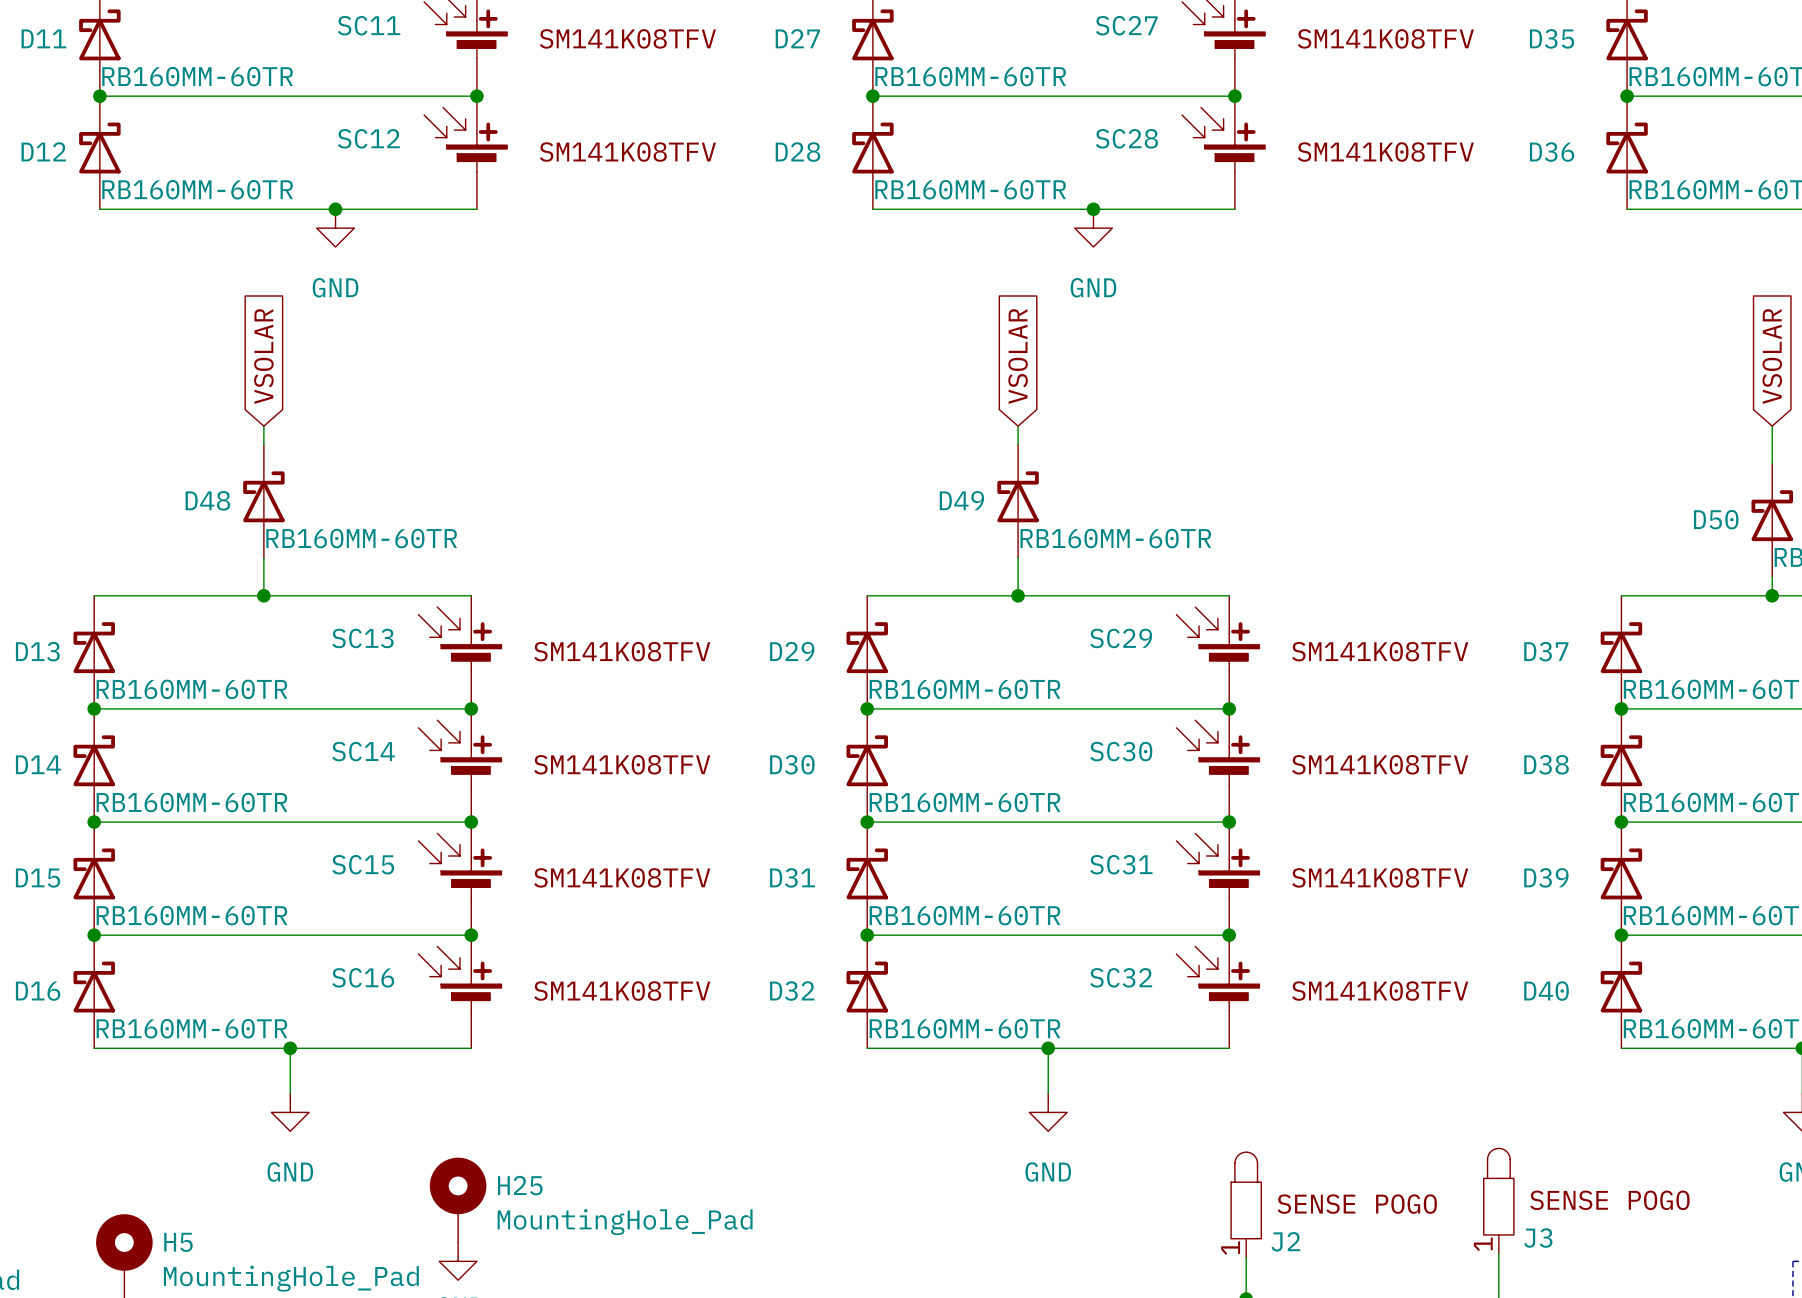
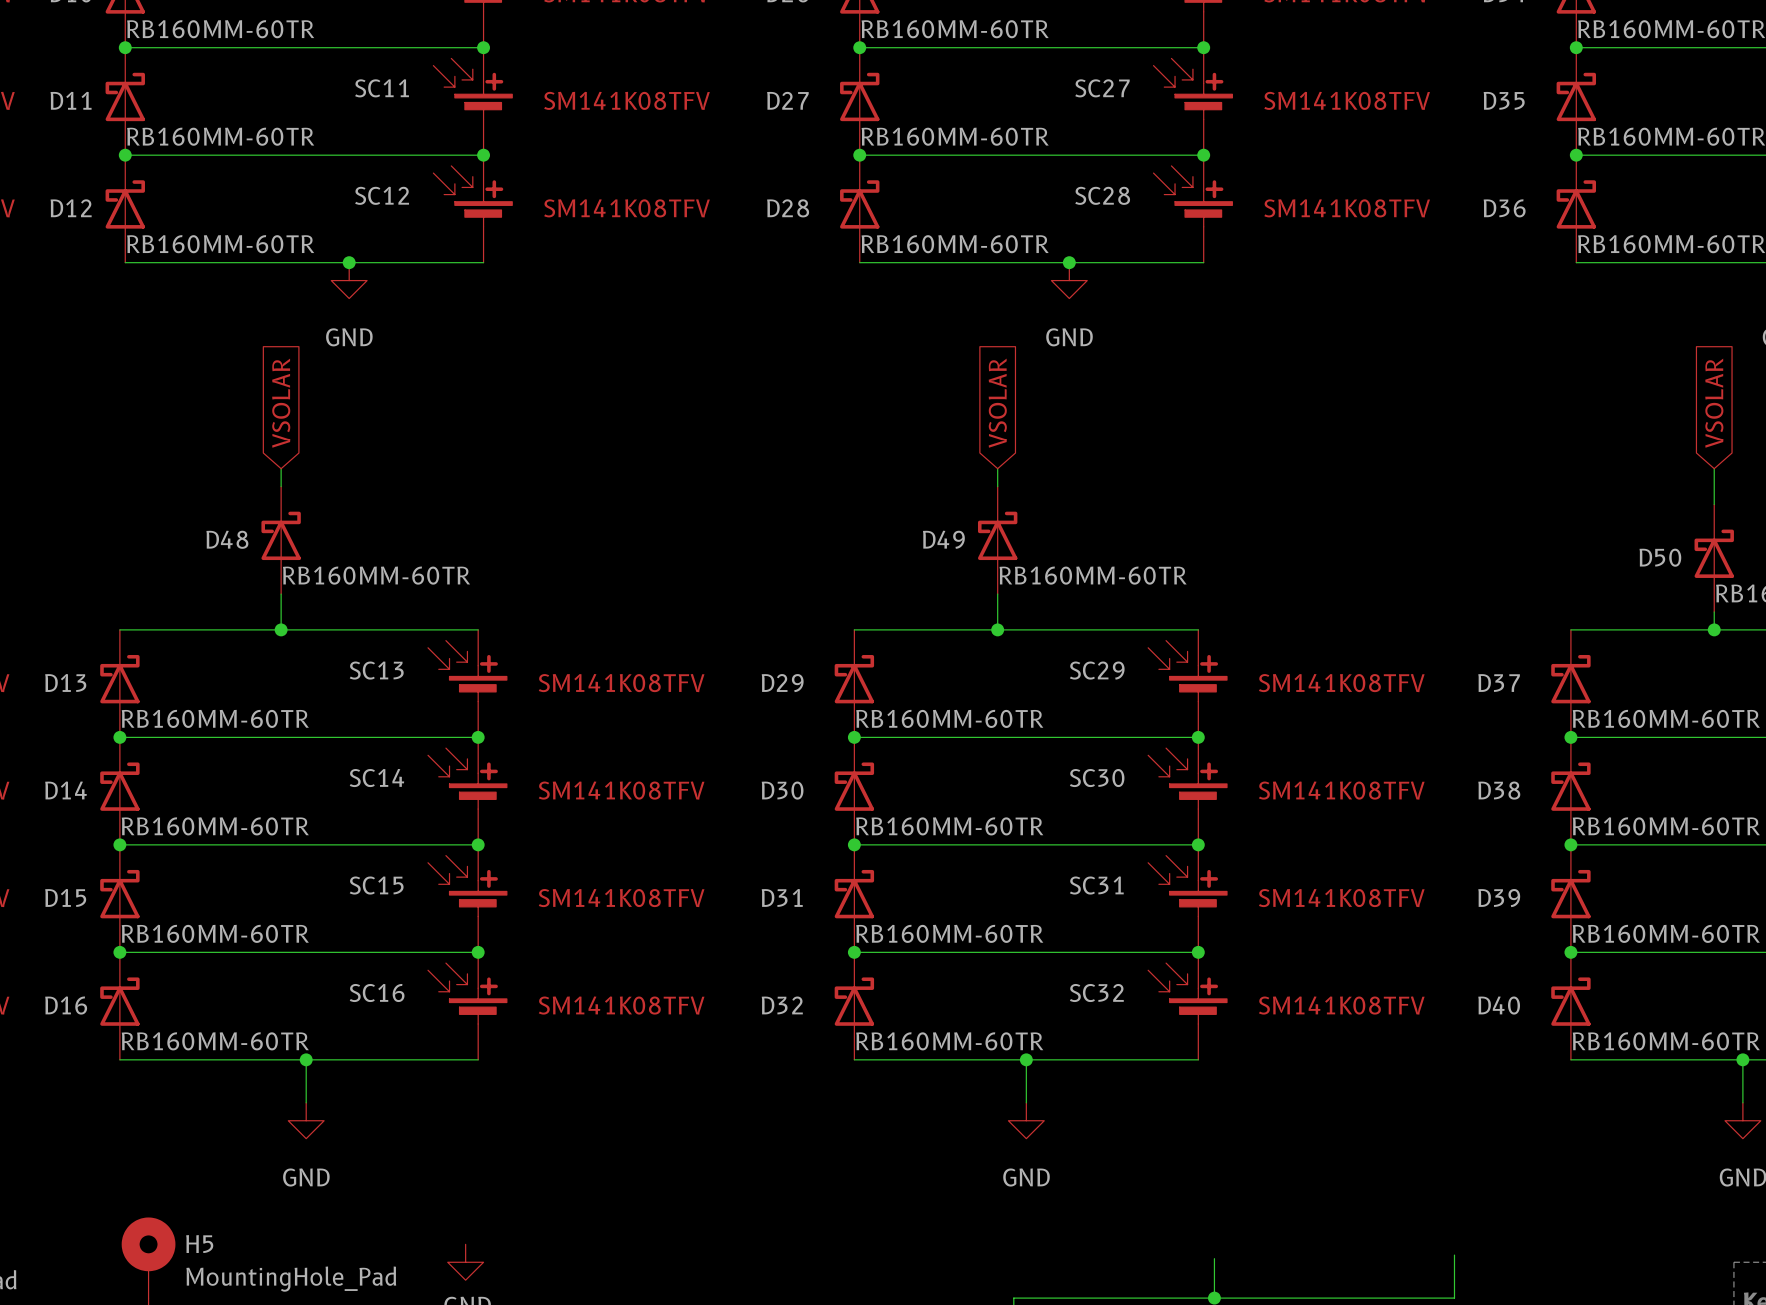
H25: MountingHole_Pad (458, 1200) -> none
J3: (1498, 1201) -> none
J2: (1246, 1204) -> none

